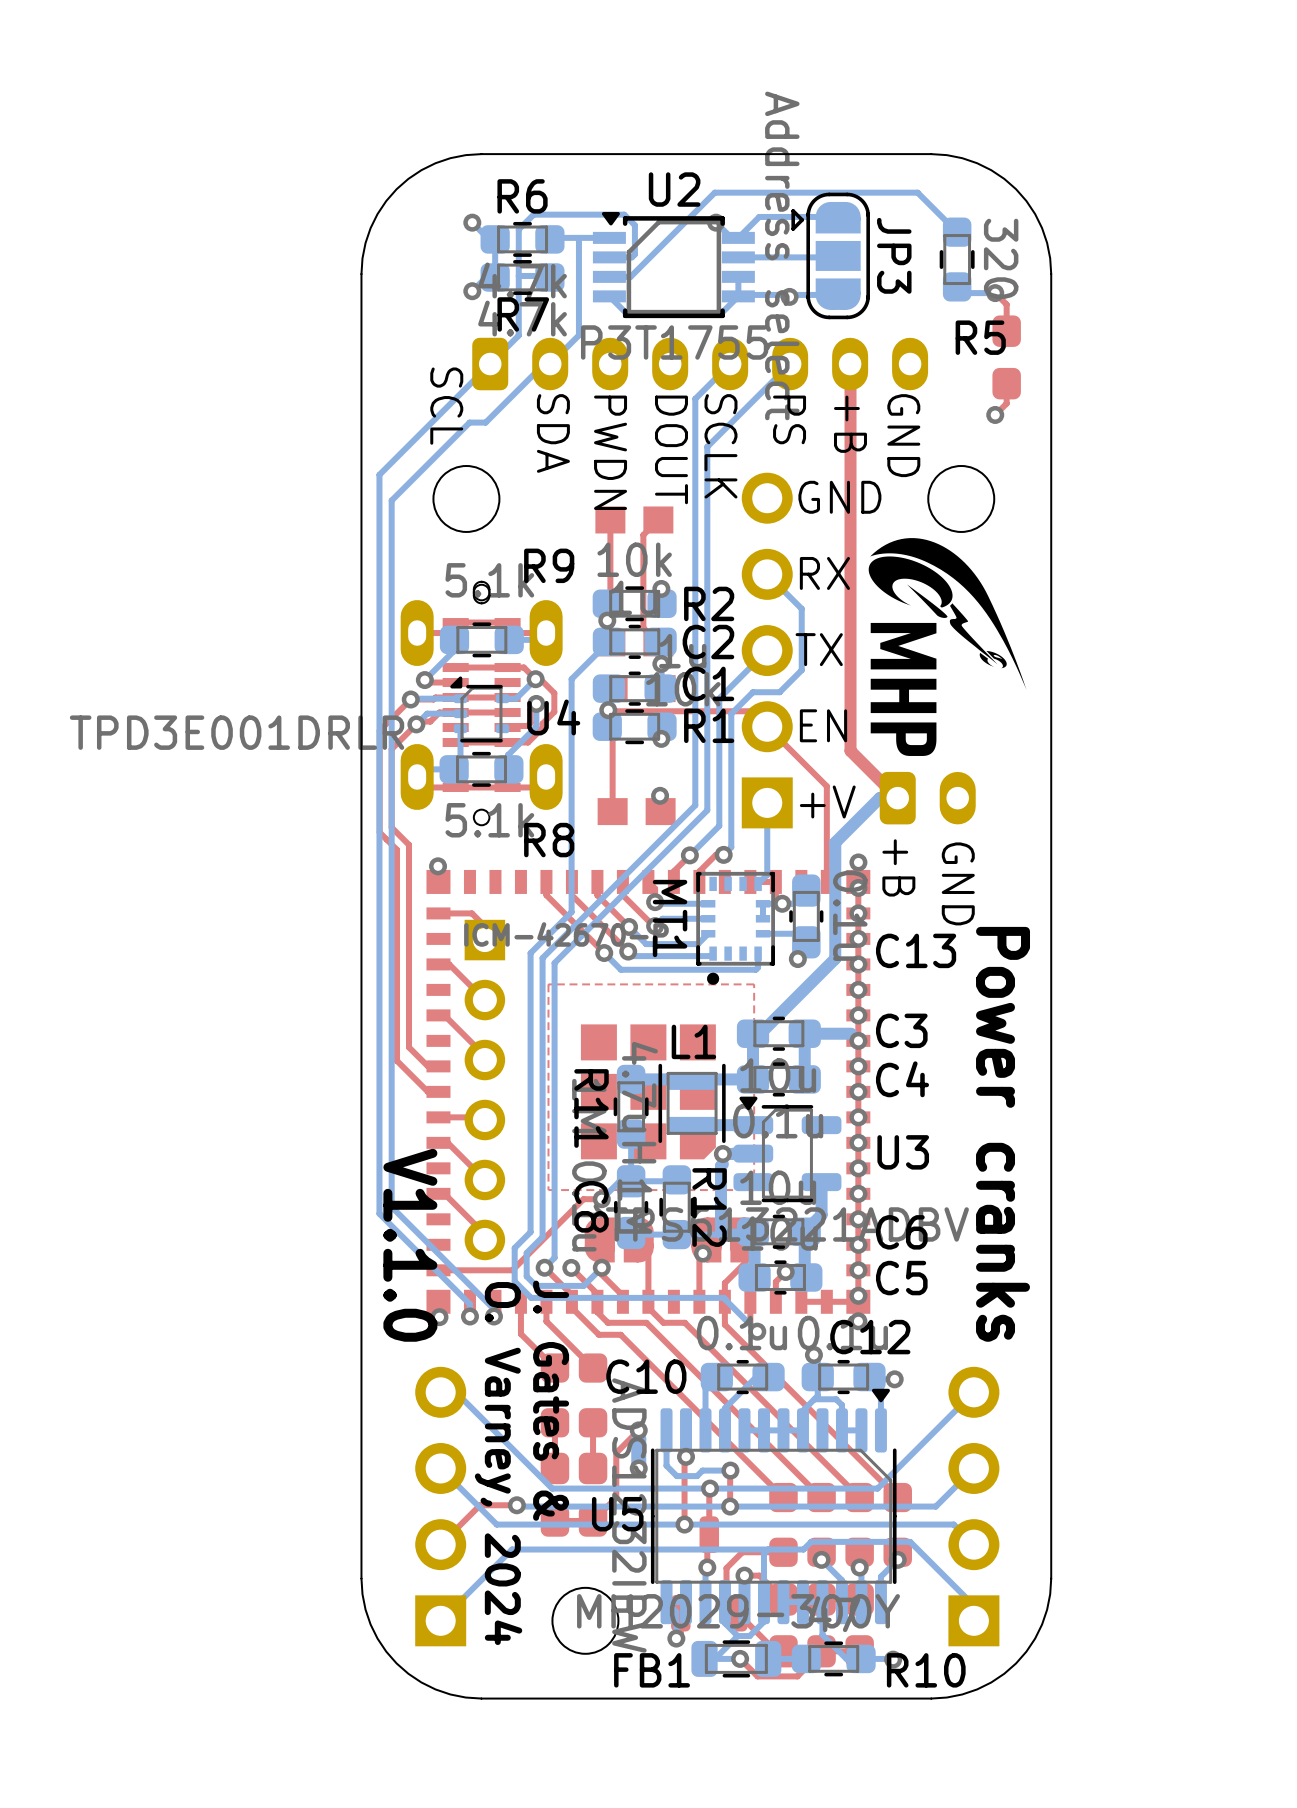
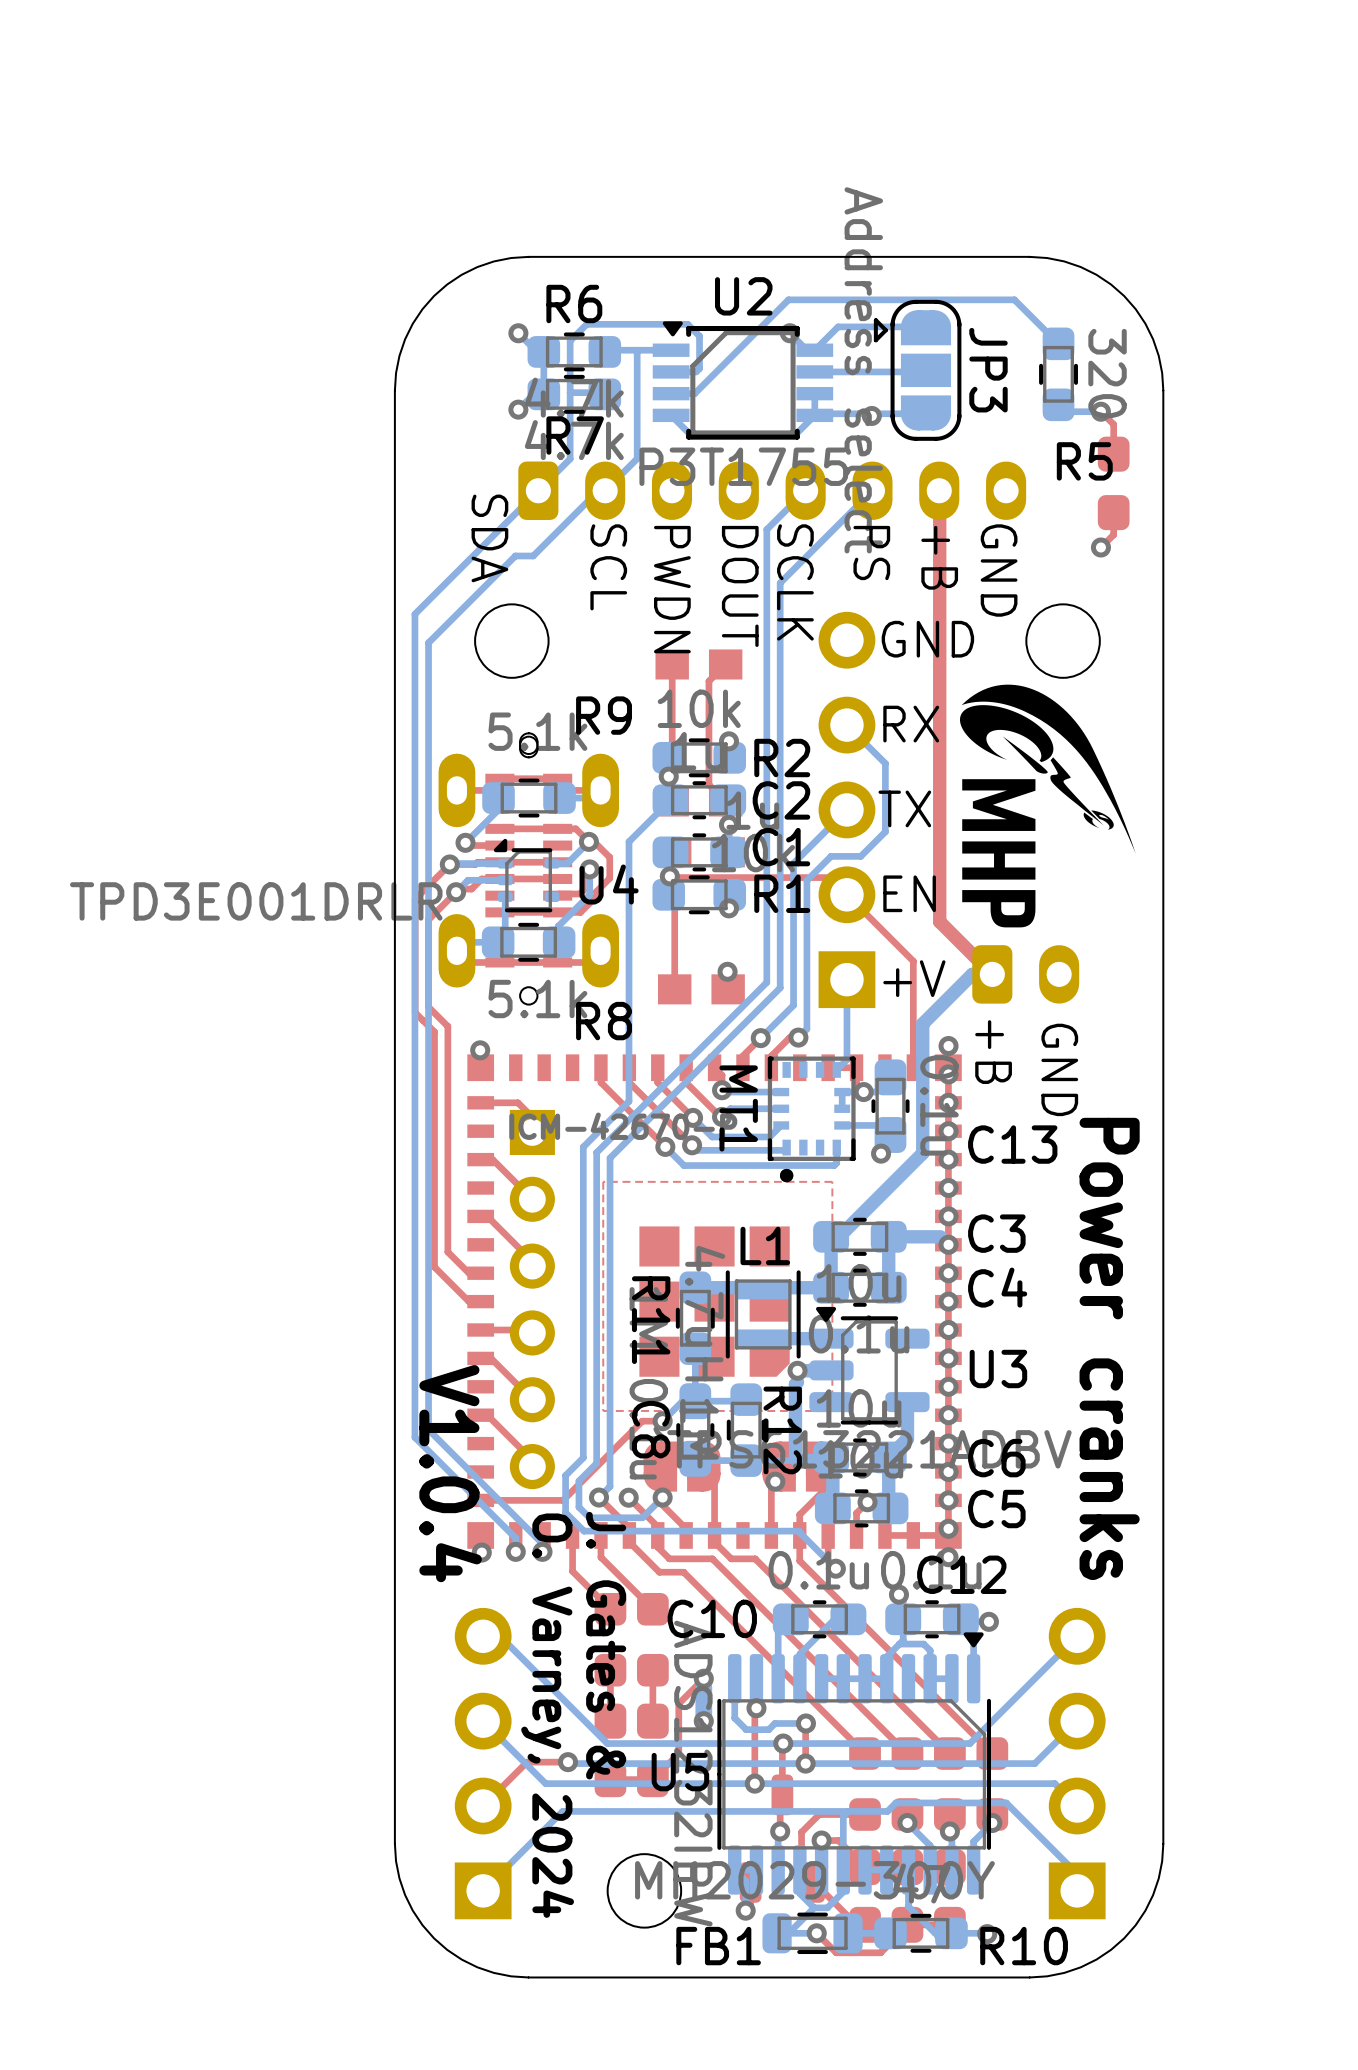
text: SCL (446, 406) -> SDA (489, 538)
text: SDA (553, 433) -> SCL (608, 567)
text: V1.1.0 (410, 1245) -> V1.0.4 (450, 1473)

